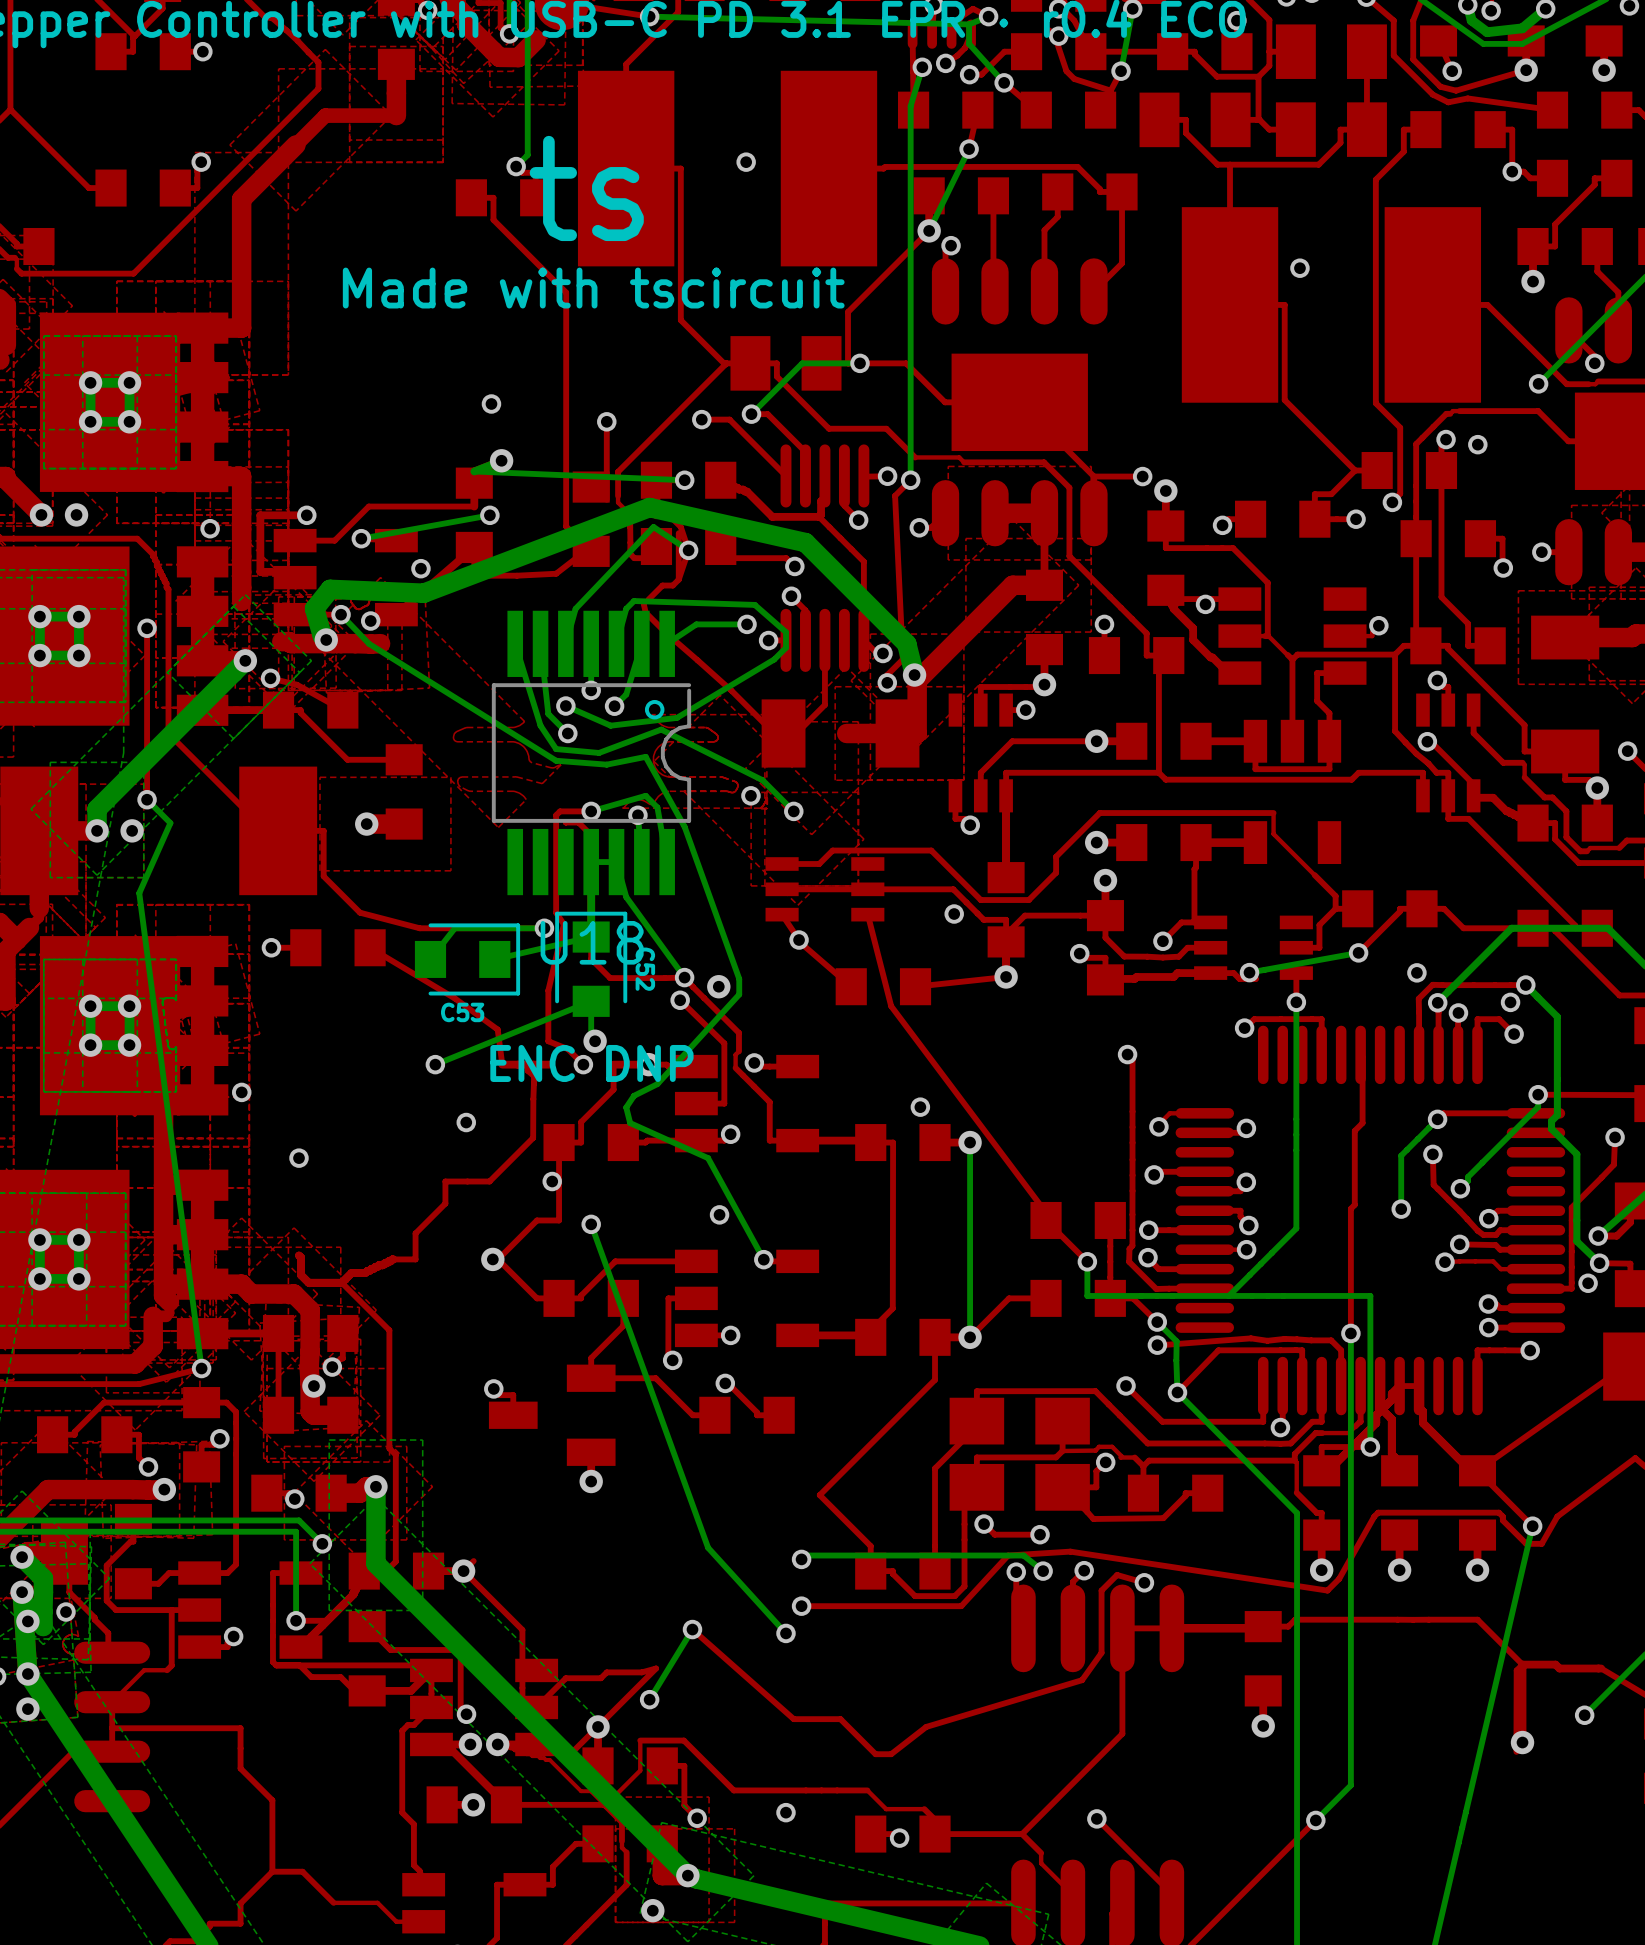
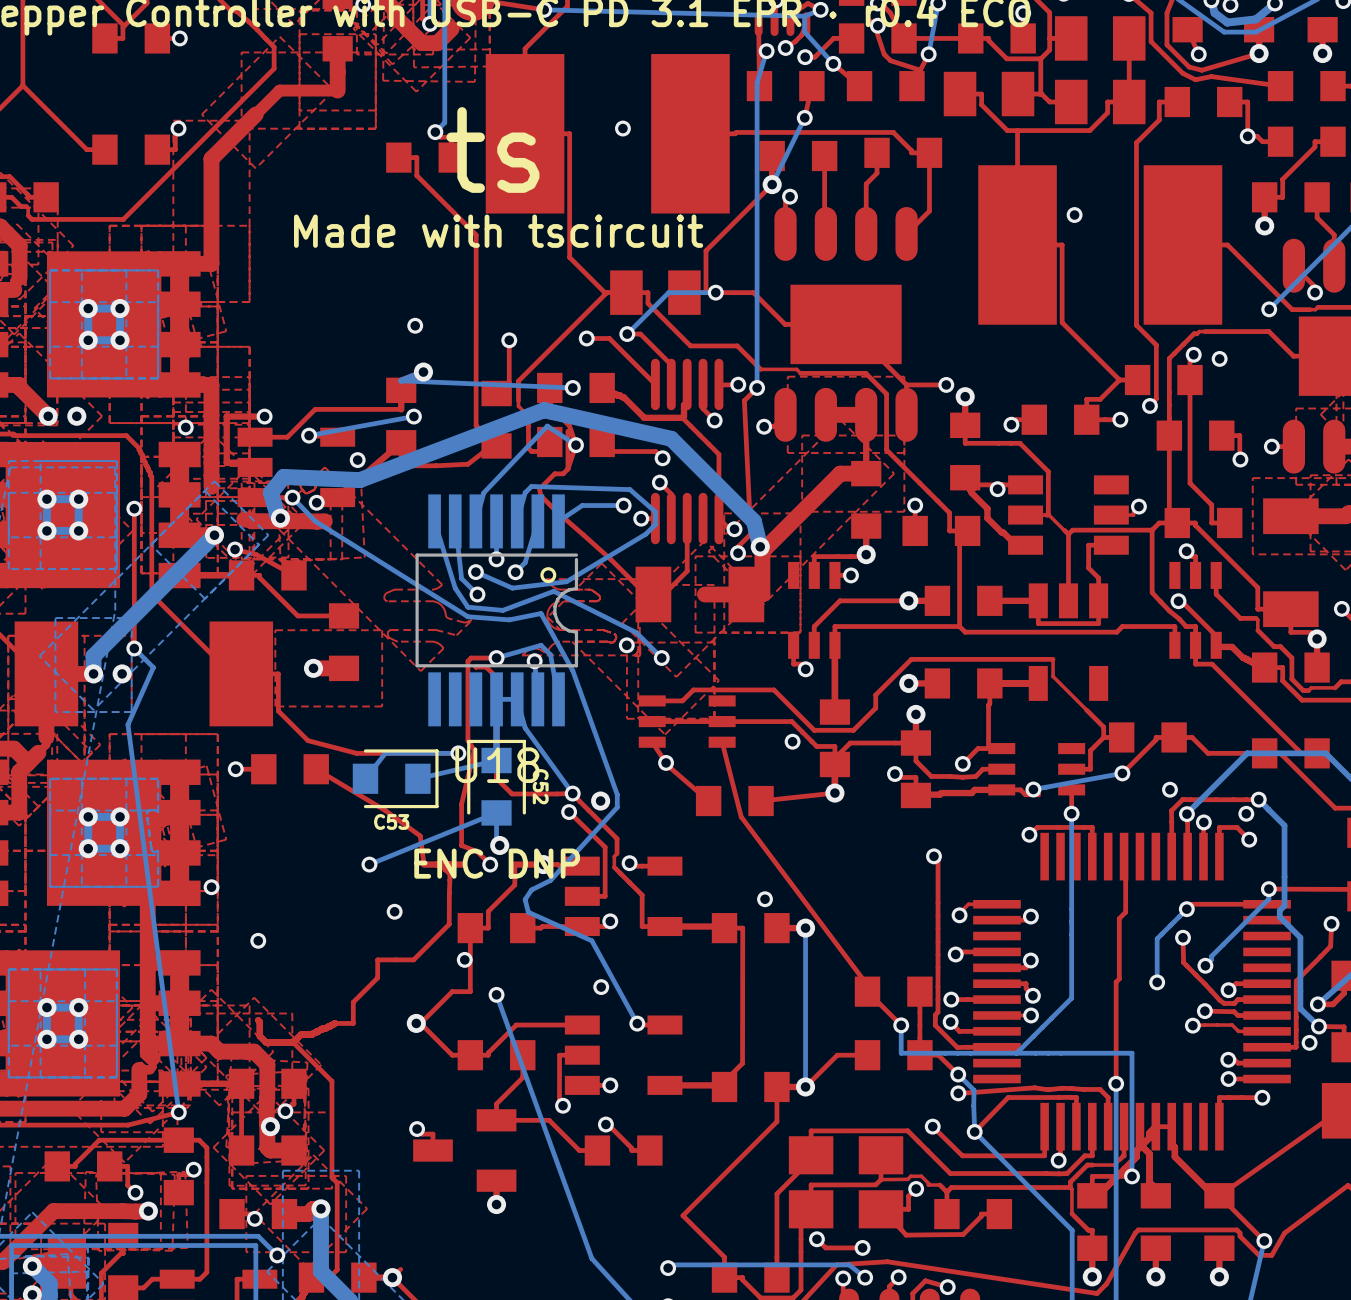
part footprint: [1175, 1025, 1566, 1416] -> [973, 832, 1291, 1151]

